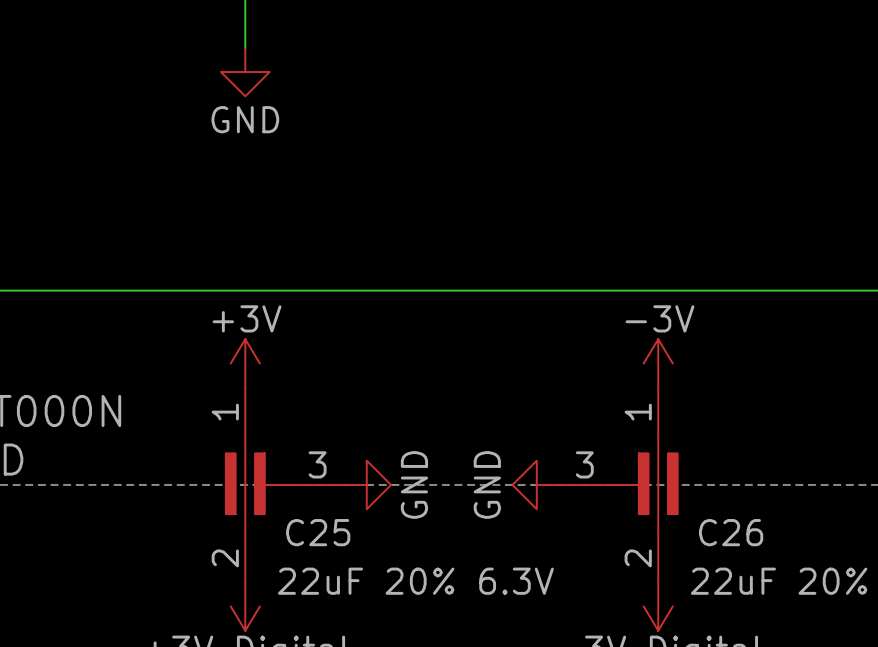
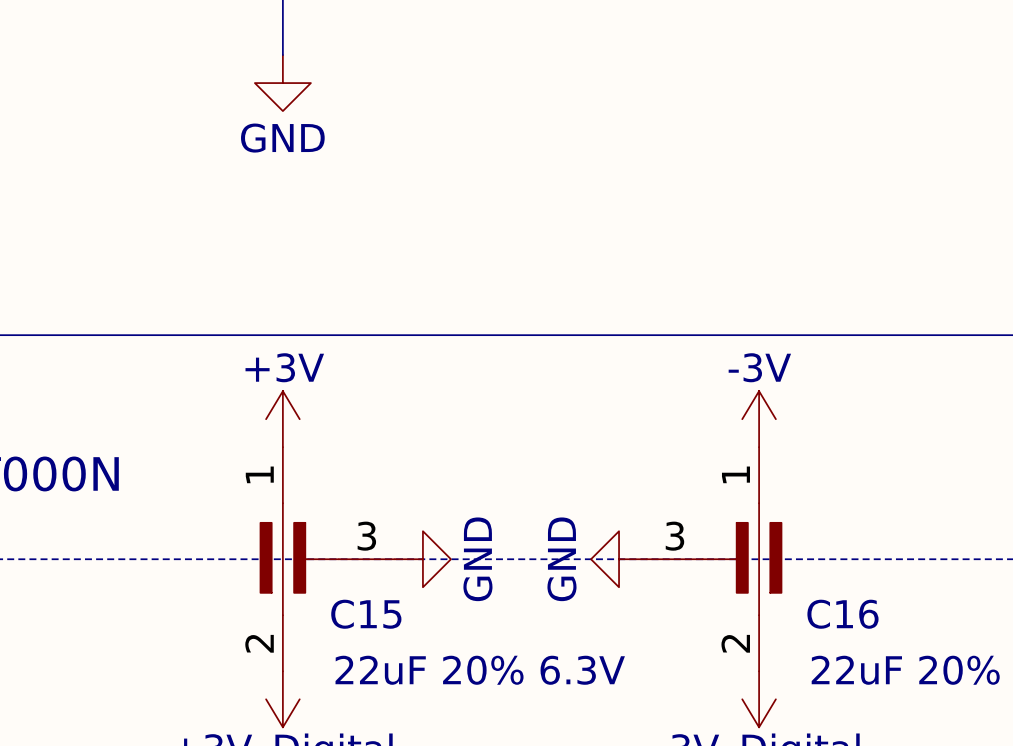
C25 name: C25 (318, 532) -> C15 (366, 614)
C26 name: C26 (731, 532) -> C16 (842, 614)

